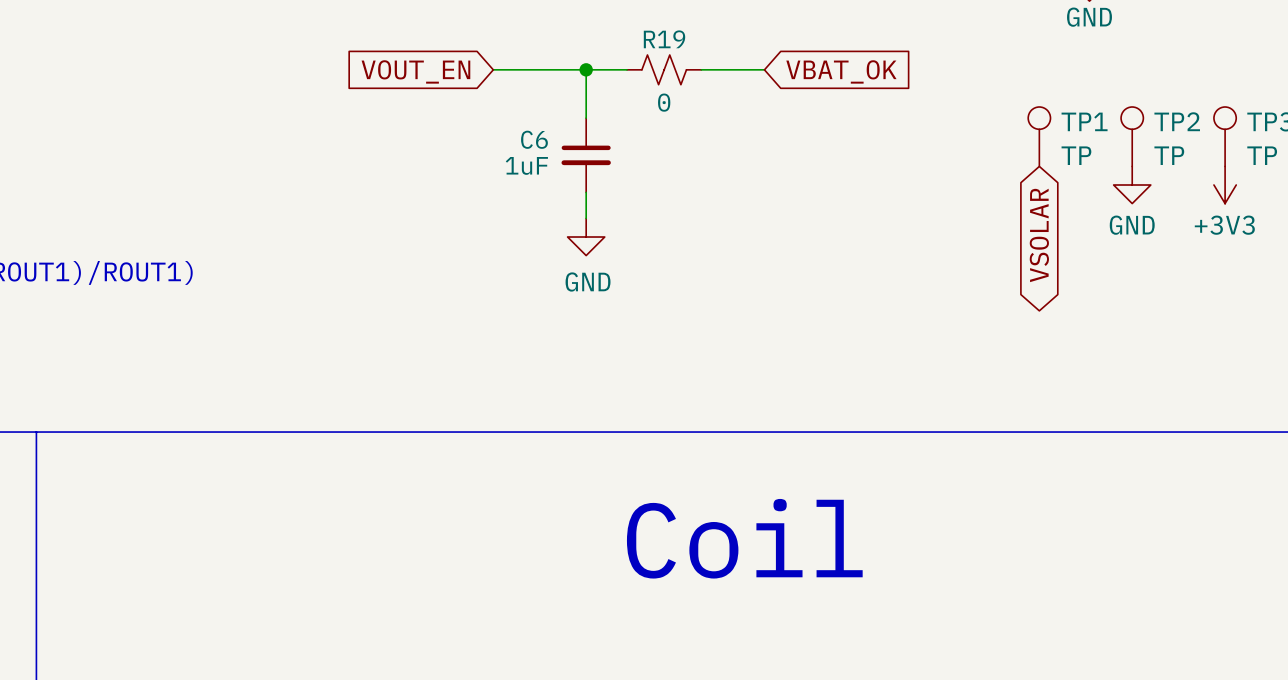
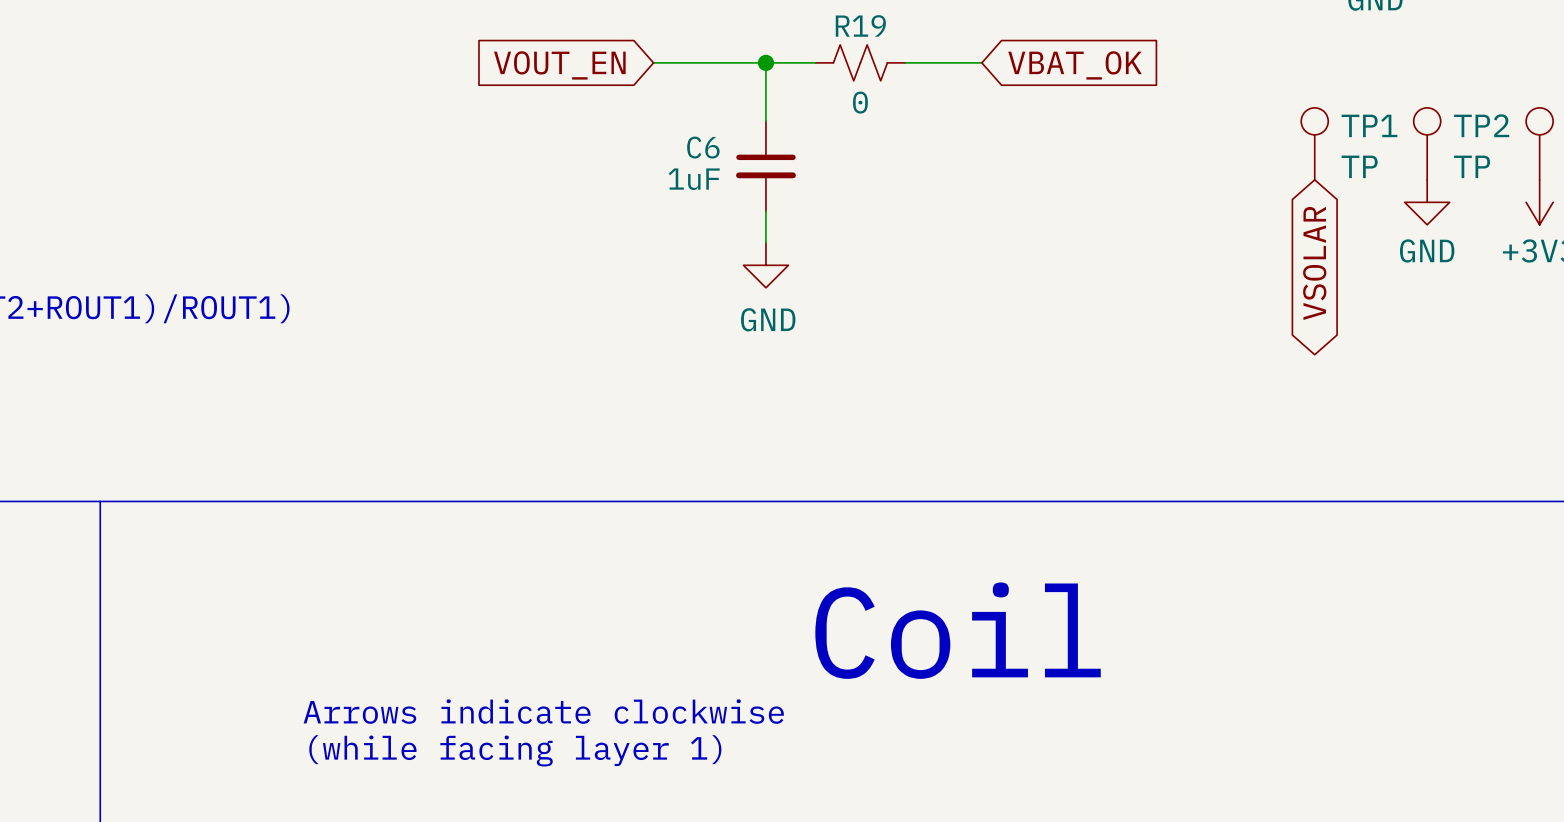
text: none -> Arrows indicate clockwise (543, 711)
text: none -> (while facing layer 1) (515, 750)

